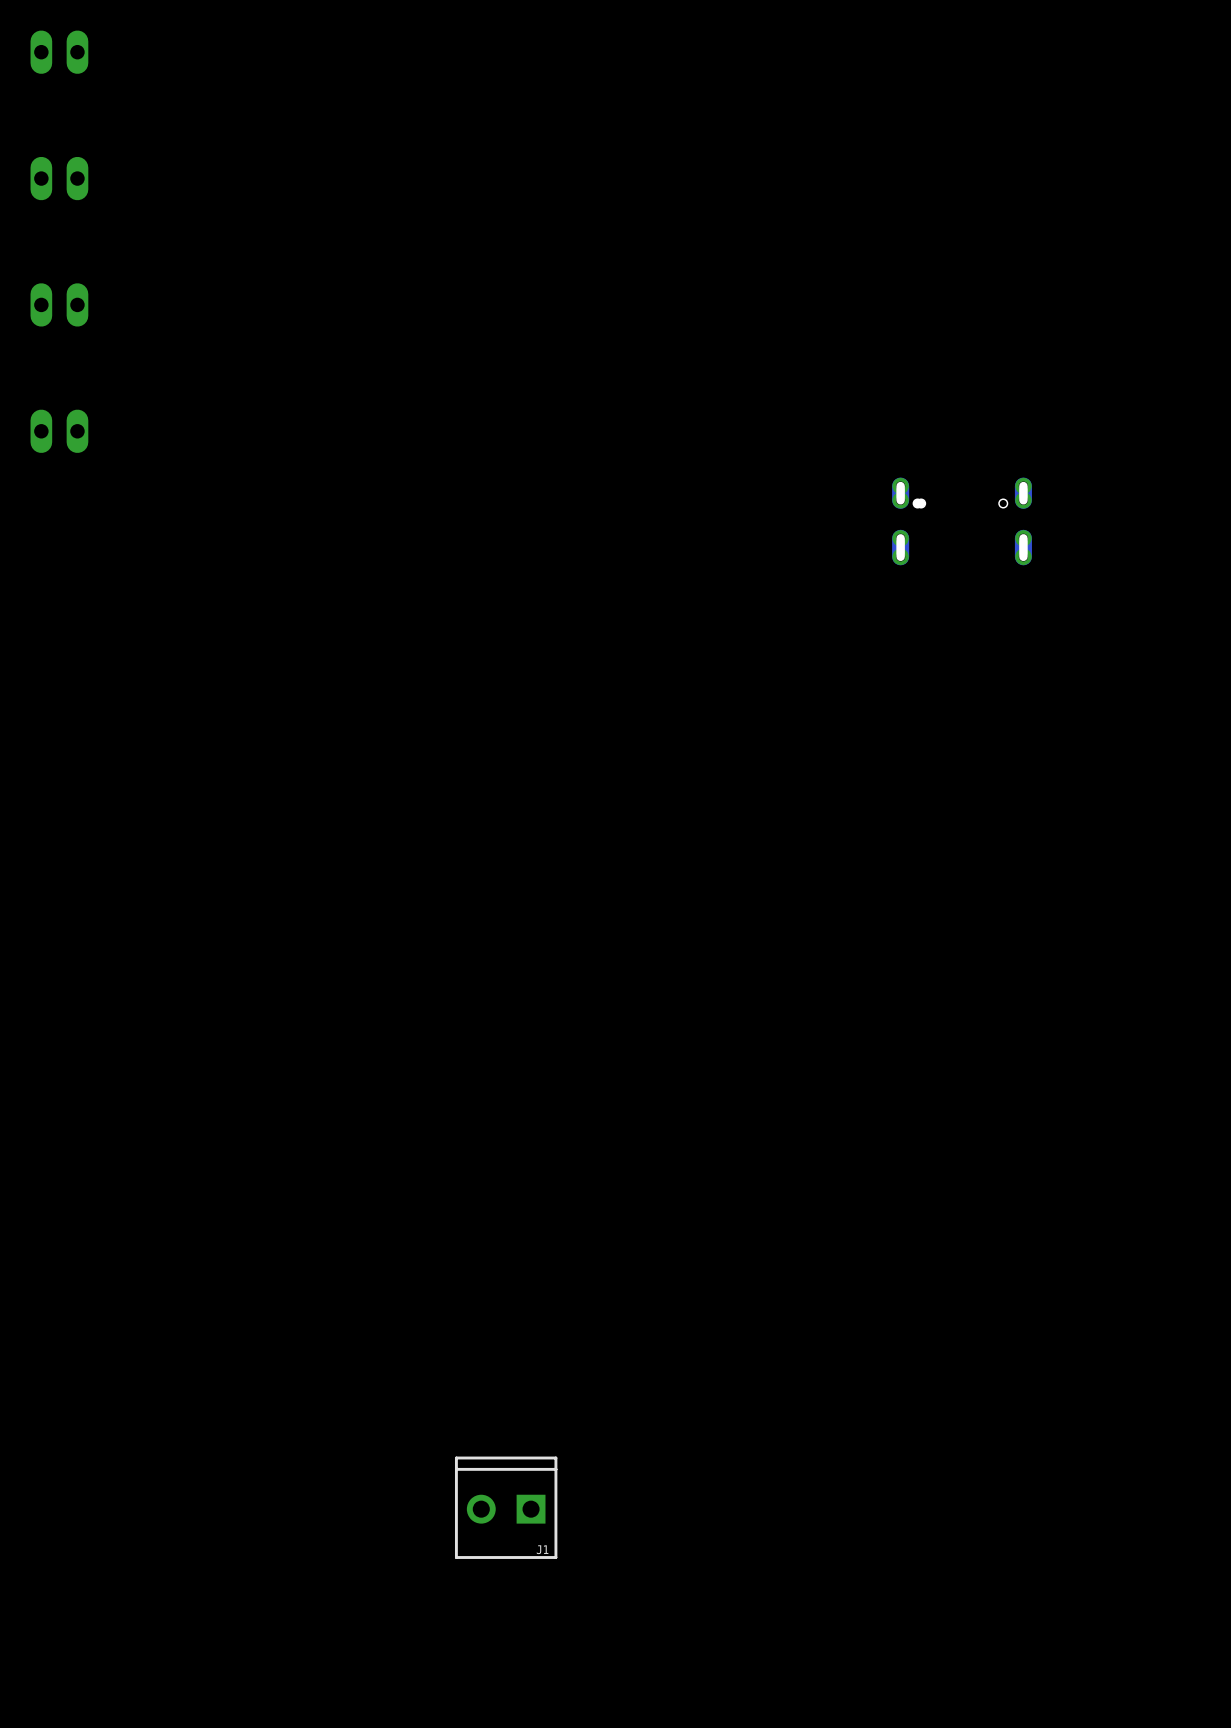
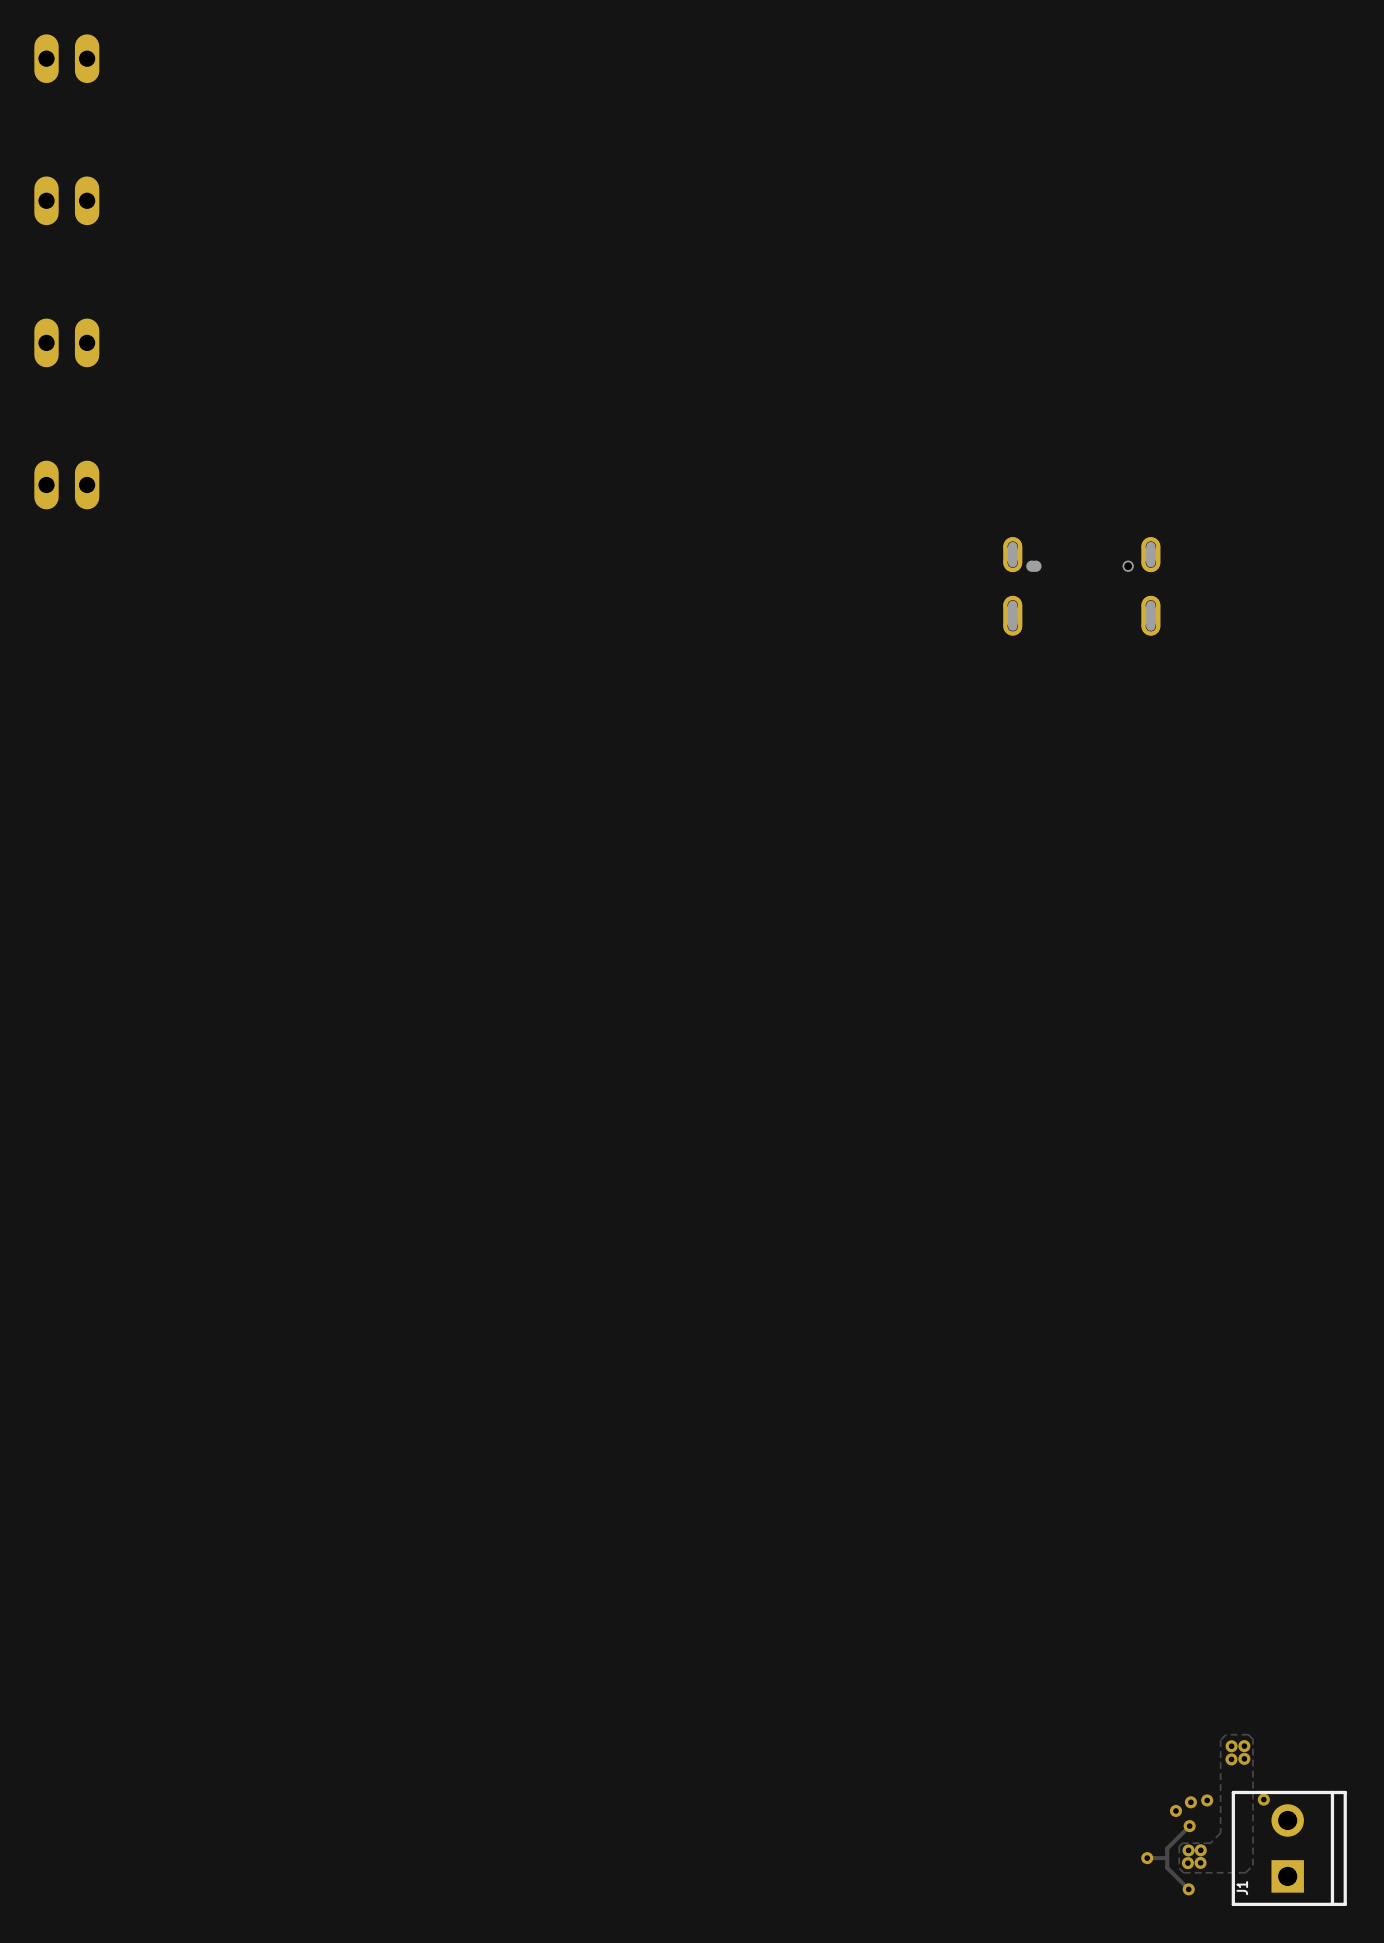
J1 rotation: 0° (506, 1507) -> 90° clockwise (1289, 1848)
J1 position: (506, 1507) -> (1289, 1848)
zone outline: none -> (1248, 1734) (1252, 1739) (1252, 1865) (1245, 1872) (1183, 1872) (1179, 1868) (1179, 1846) (1182, 1843) (1210, 1843) (1220, 1833) (1220, 1740) (1226, 1734) (1248, 1734)
via: none -> (1231, 1746)
via: none -> (1244, 1746)
via: none -> (1231, 1759)
via: none -> (1244, 1758)
via: none -> (1263, 1799)
via: none -> (1207, 1800)
via: none -> (1190, 1802)
via: none -> (1175, 1810)
track: none -> (1189, 1826) (1167, 1848) (1167, 1867) (1188, 1889)
via: none -> (1189, 1826)
via: none -> (1188, 1850)
via: none -> (1200, 1850)
via: none -> (1147, 1858)
track: none -> (1167, 1858) (1147, 1858)
via: none -> (1187, 1863)
via: none -> (1200, 1862)
via: none -> (1188, 1889)

